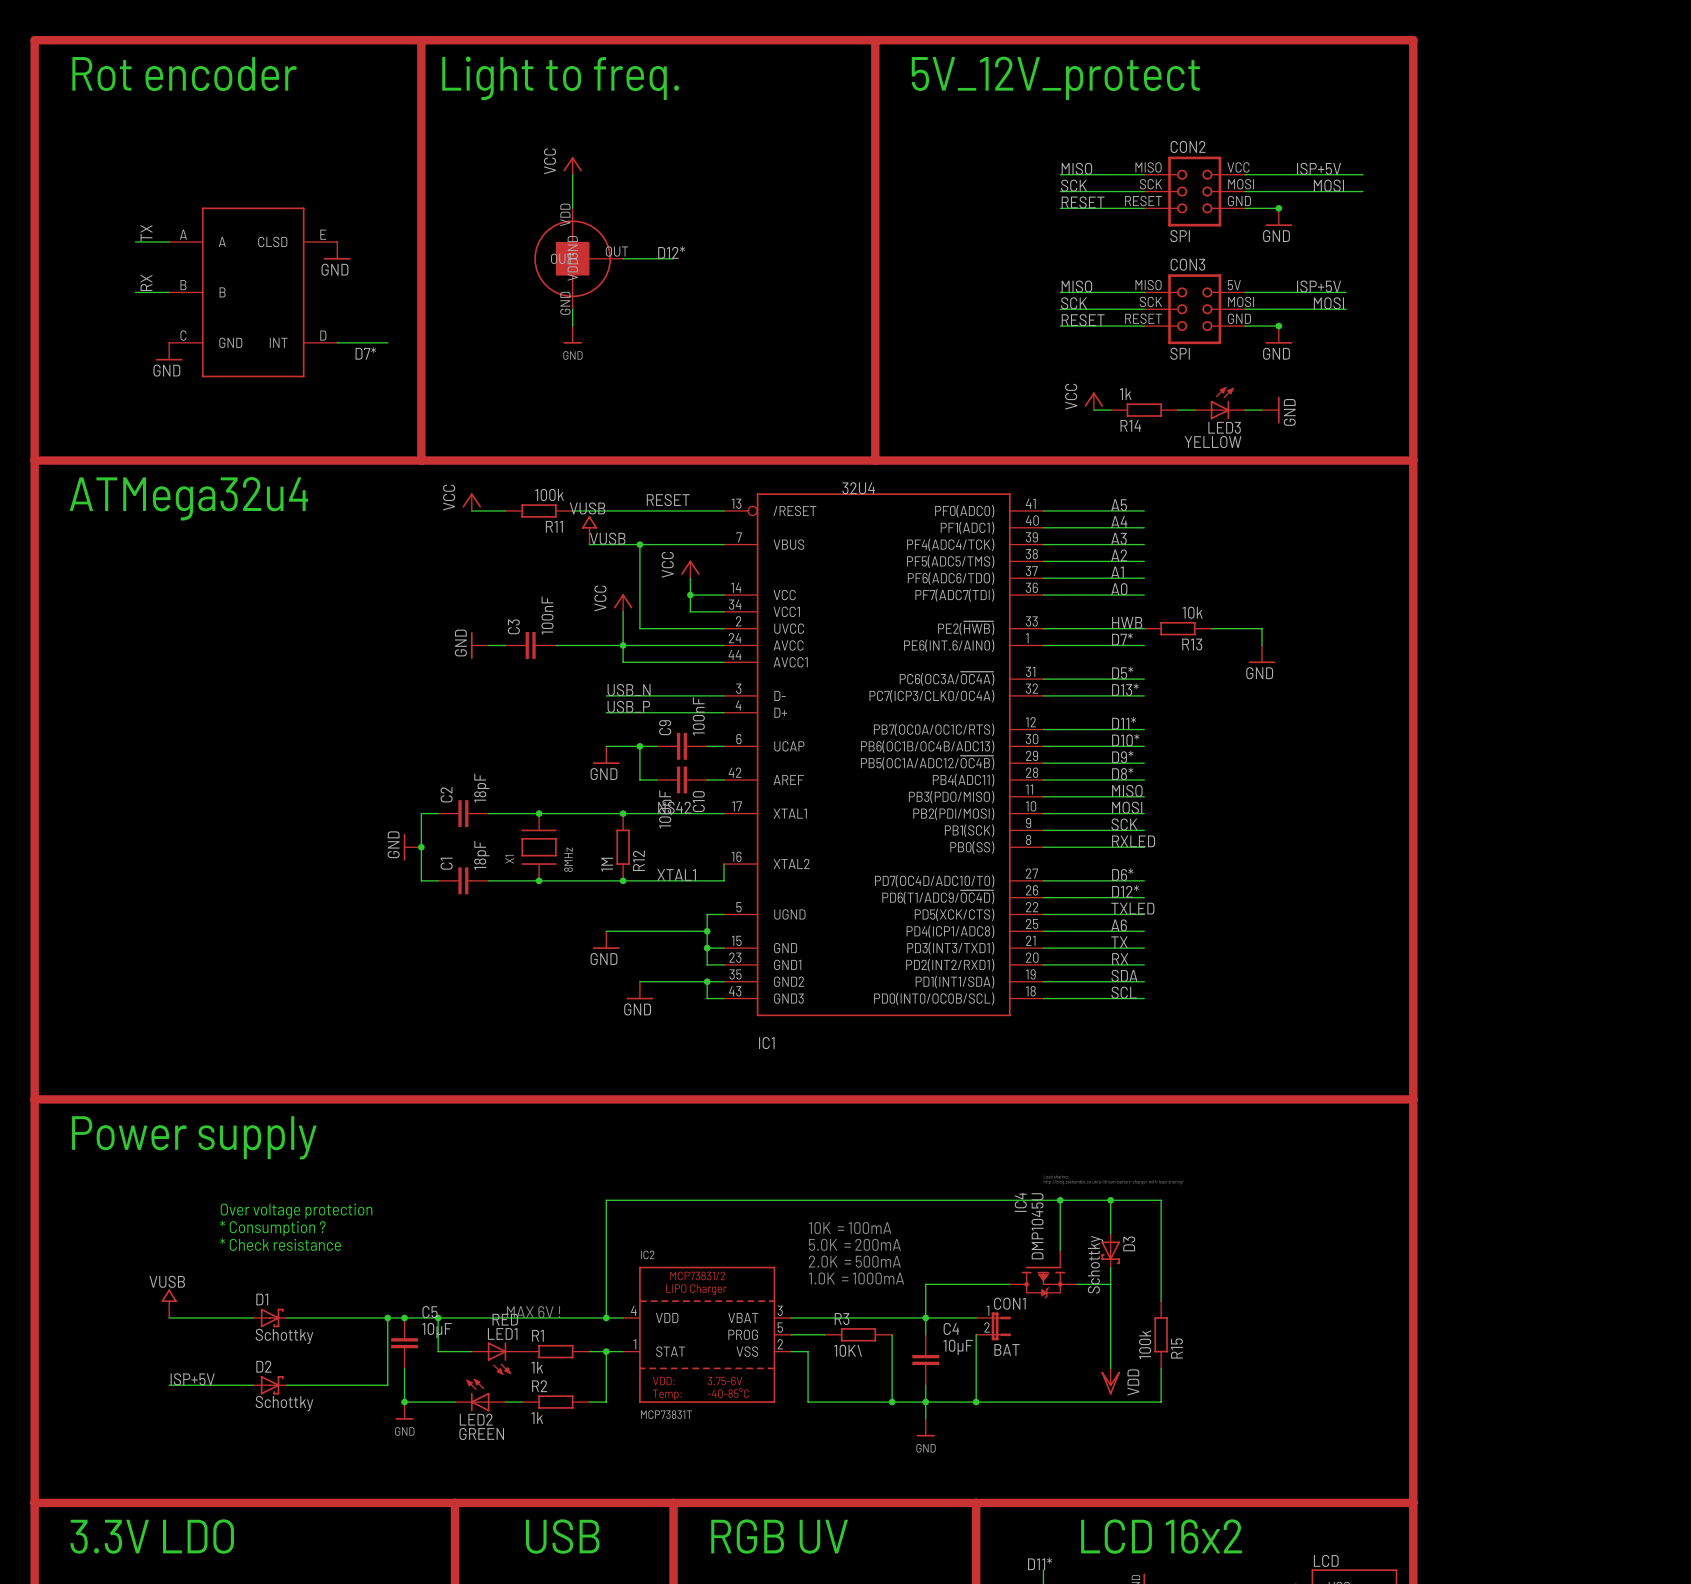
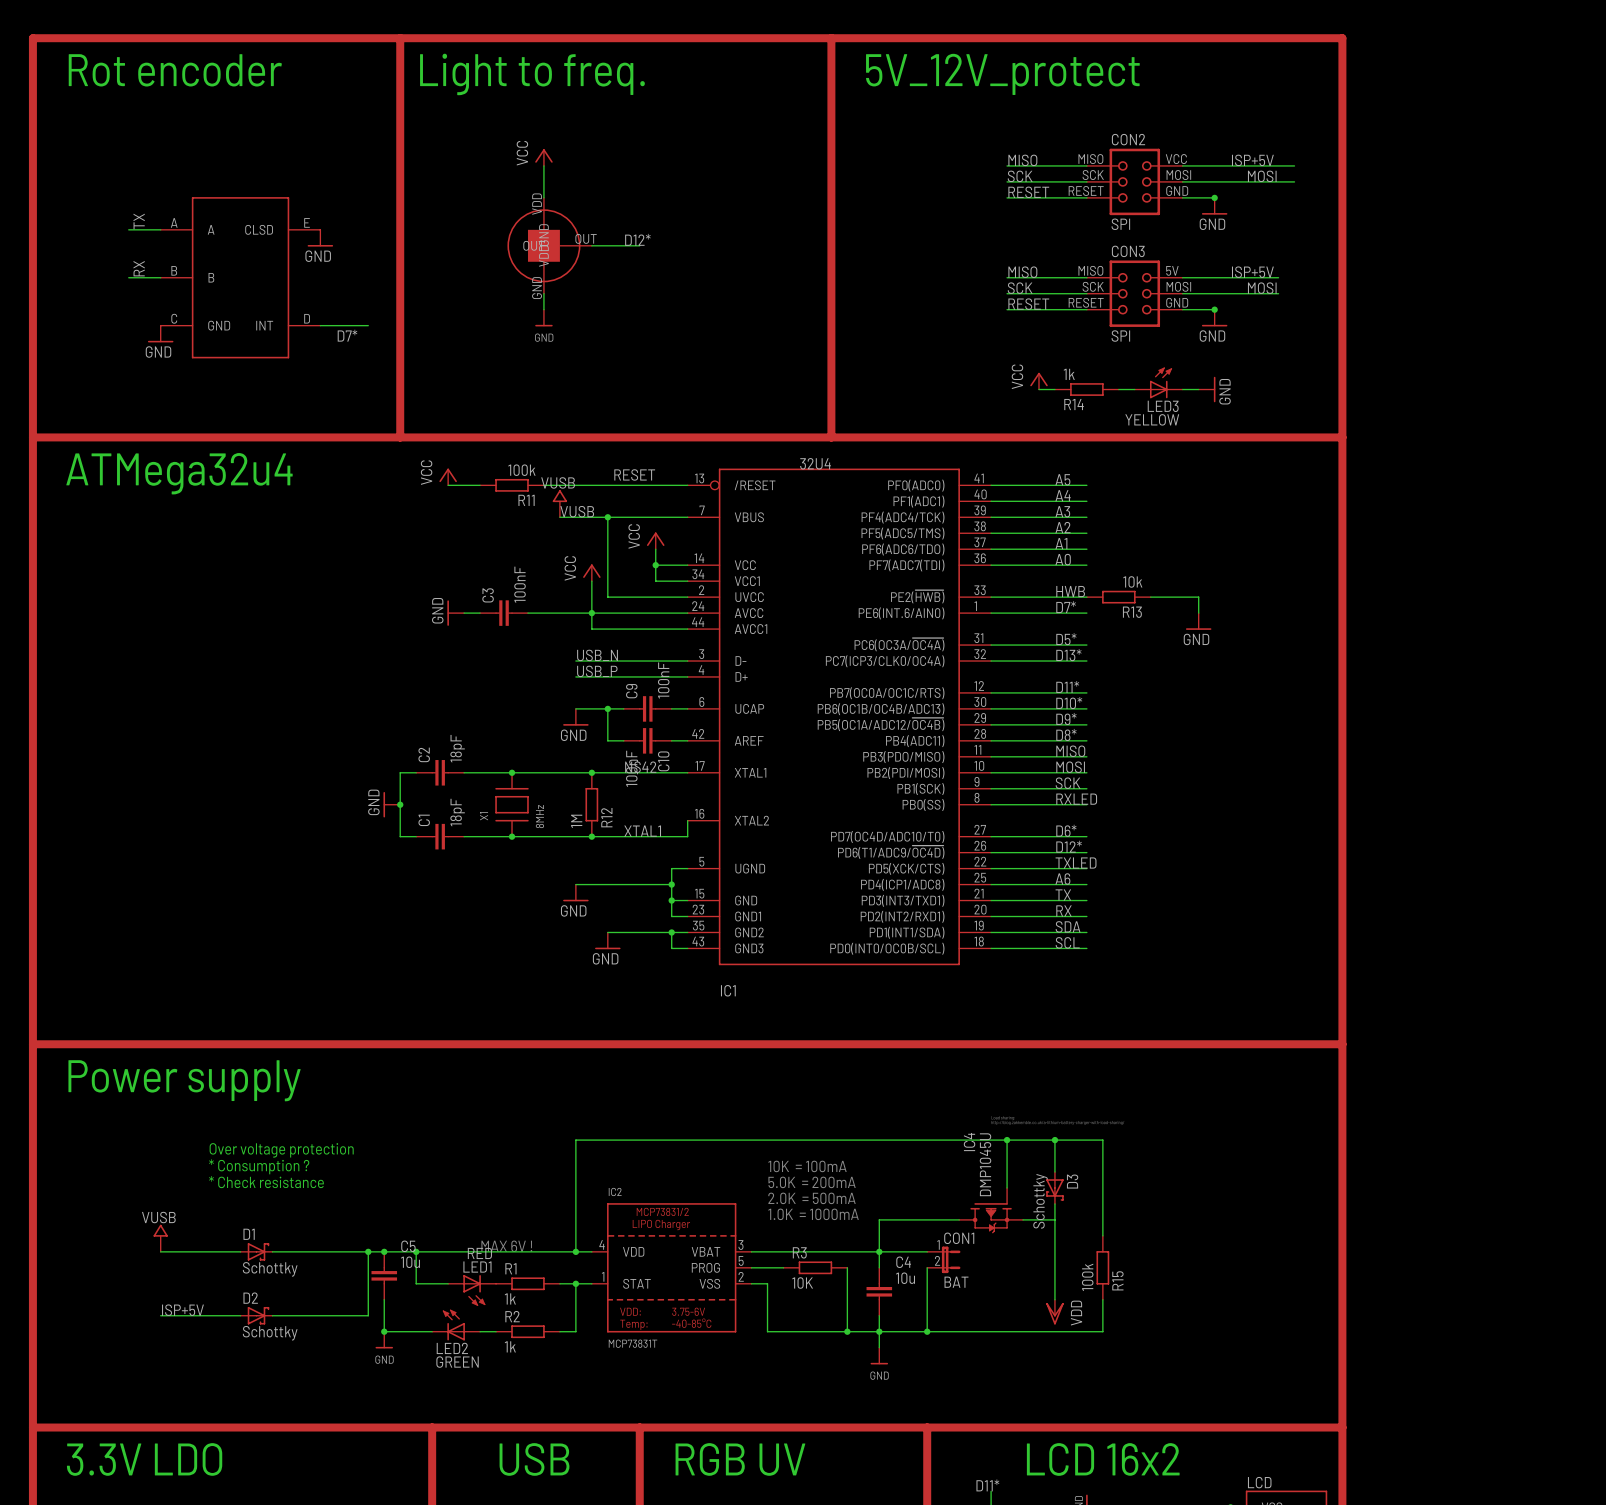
C5 value: 10µF (436, 1330) -> 10u (410, 1262)
C4 value: 10µF (958, 1347) -> 10u (905, 1278)
R3 value: 10K\ (848, 1350) -> 10K (802, 1283)

